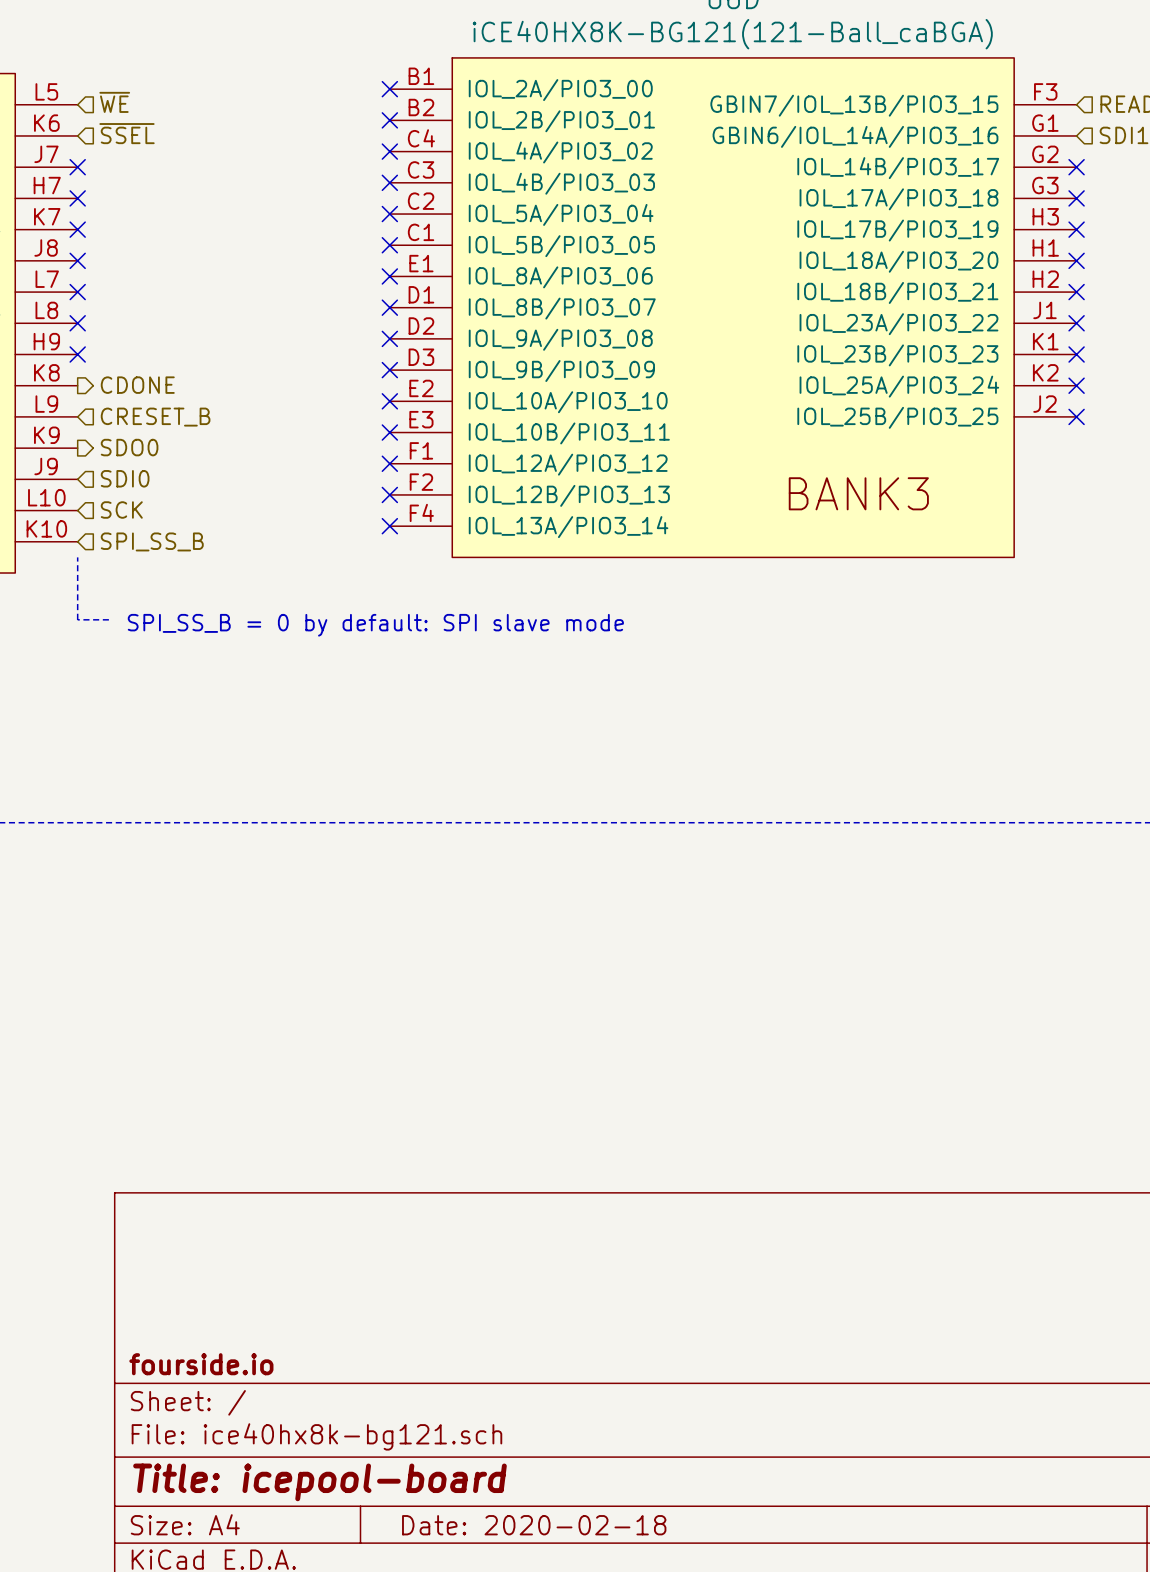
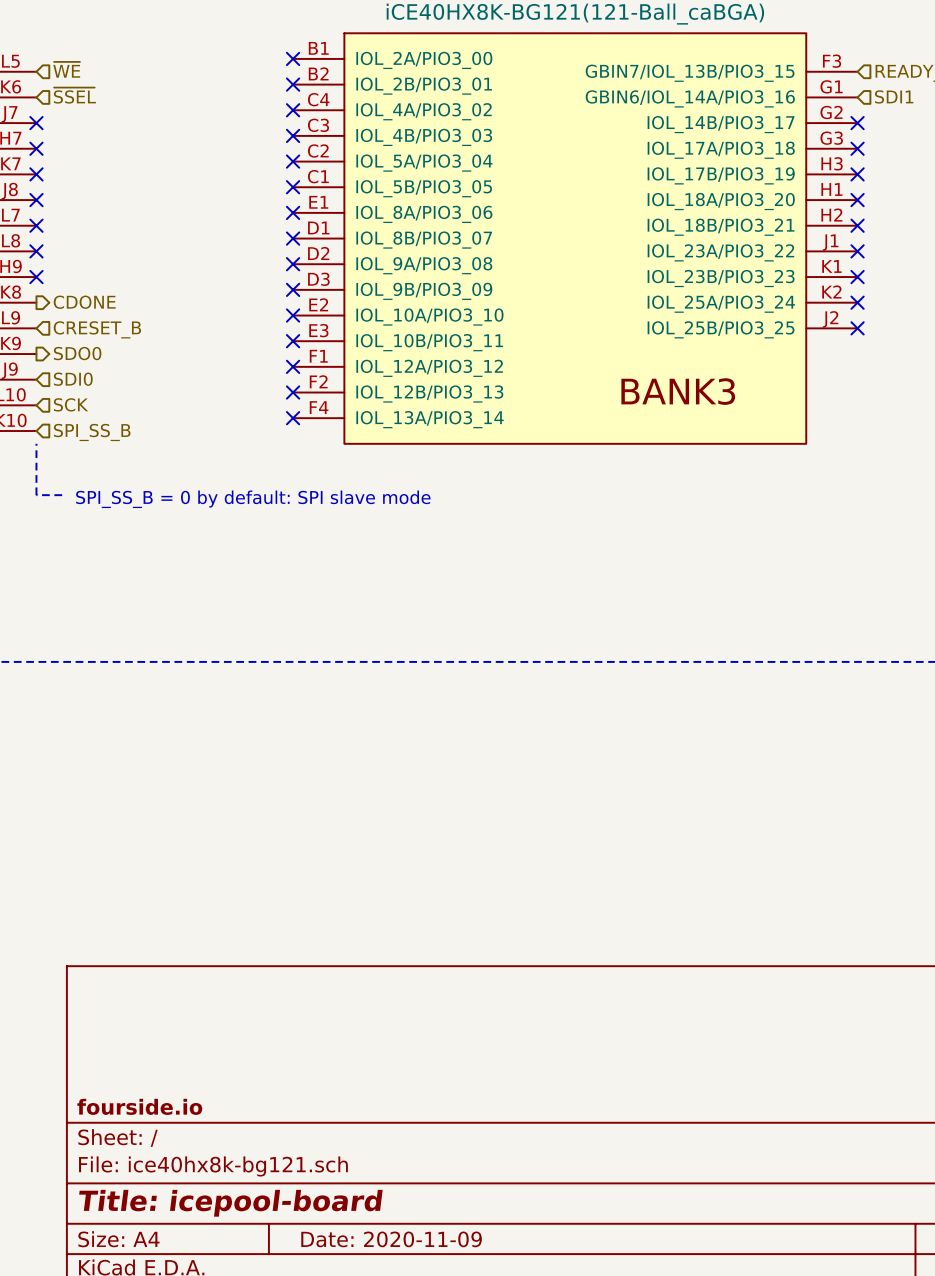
title block: Date: 2020-02-18 (534, 1525) -> Date: 2020-11-09 (391, 1239)

